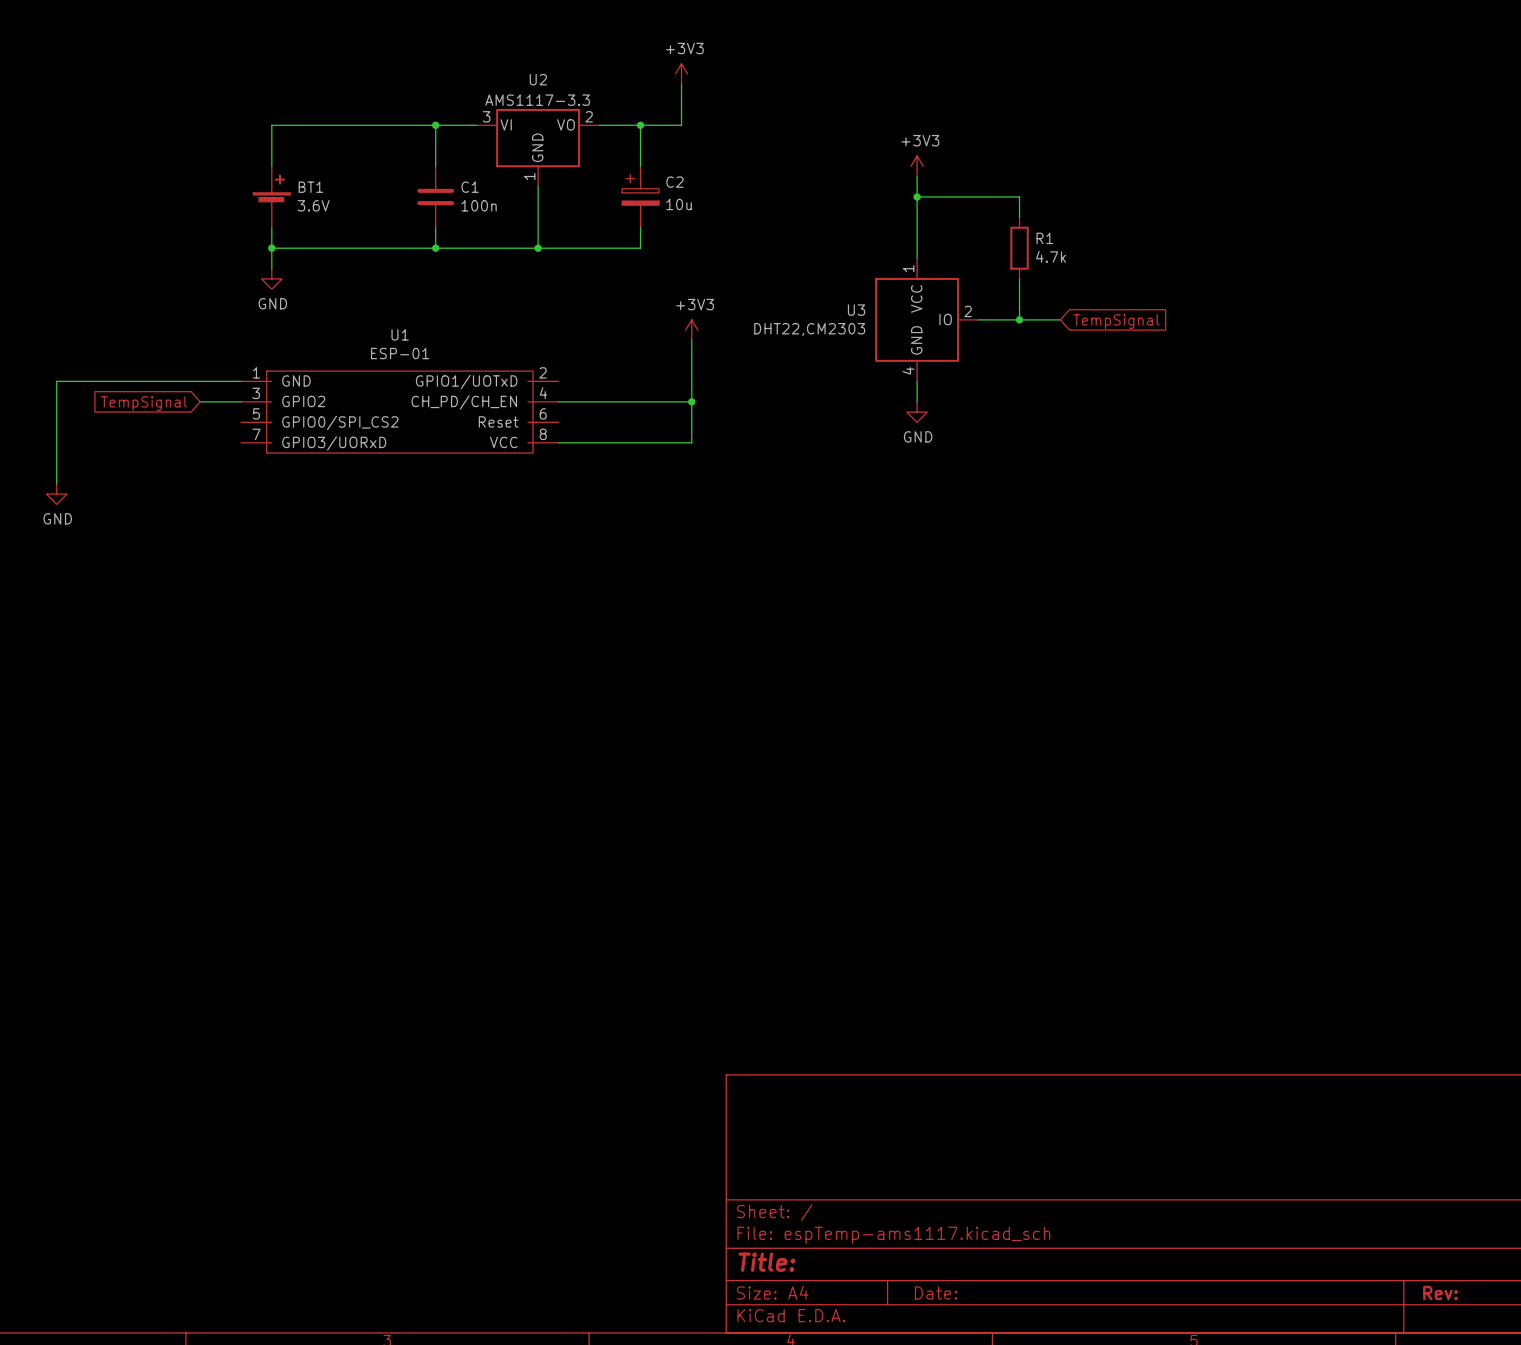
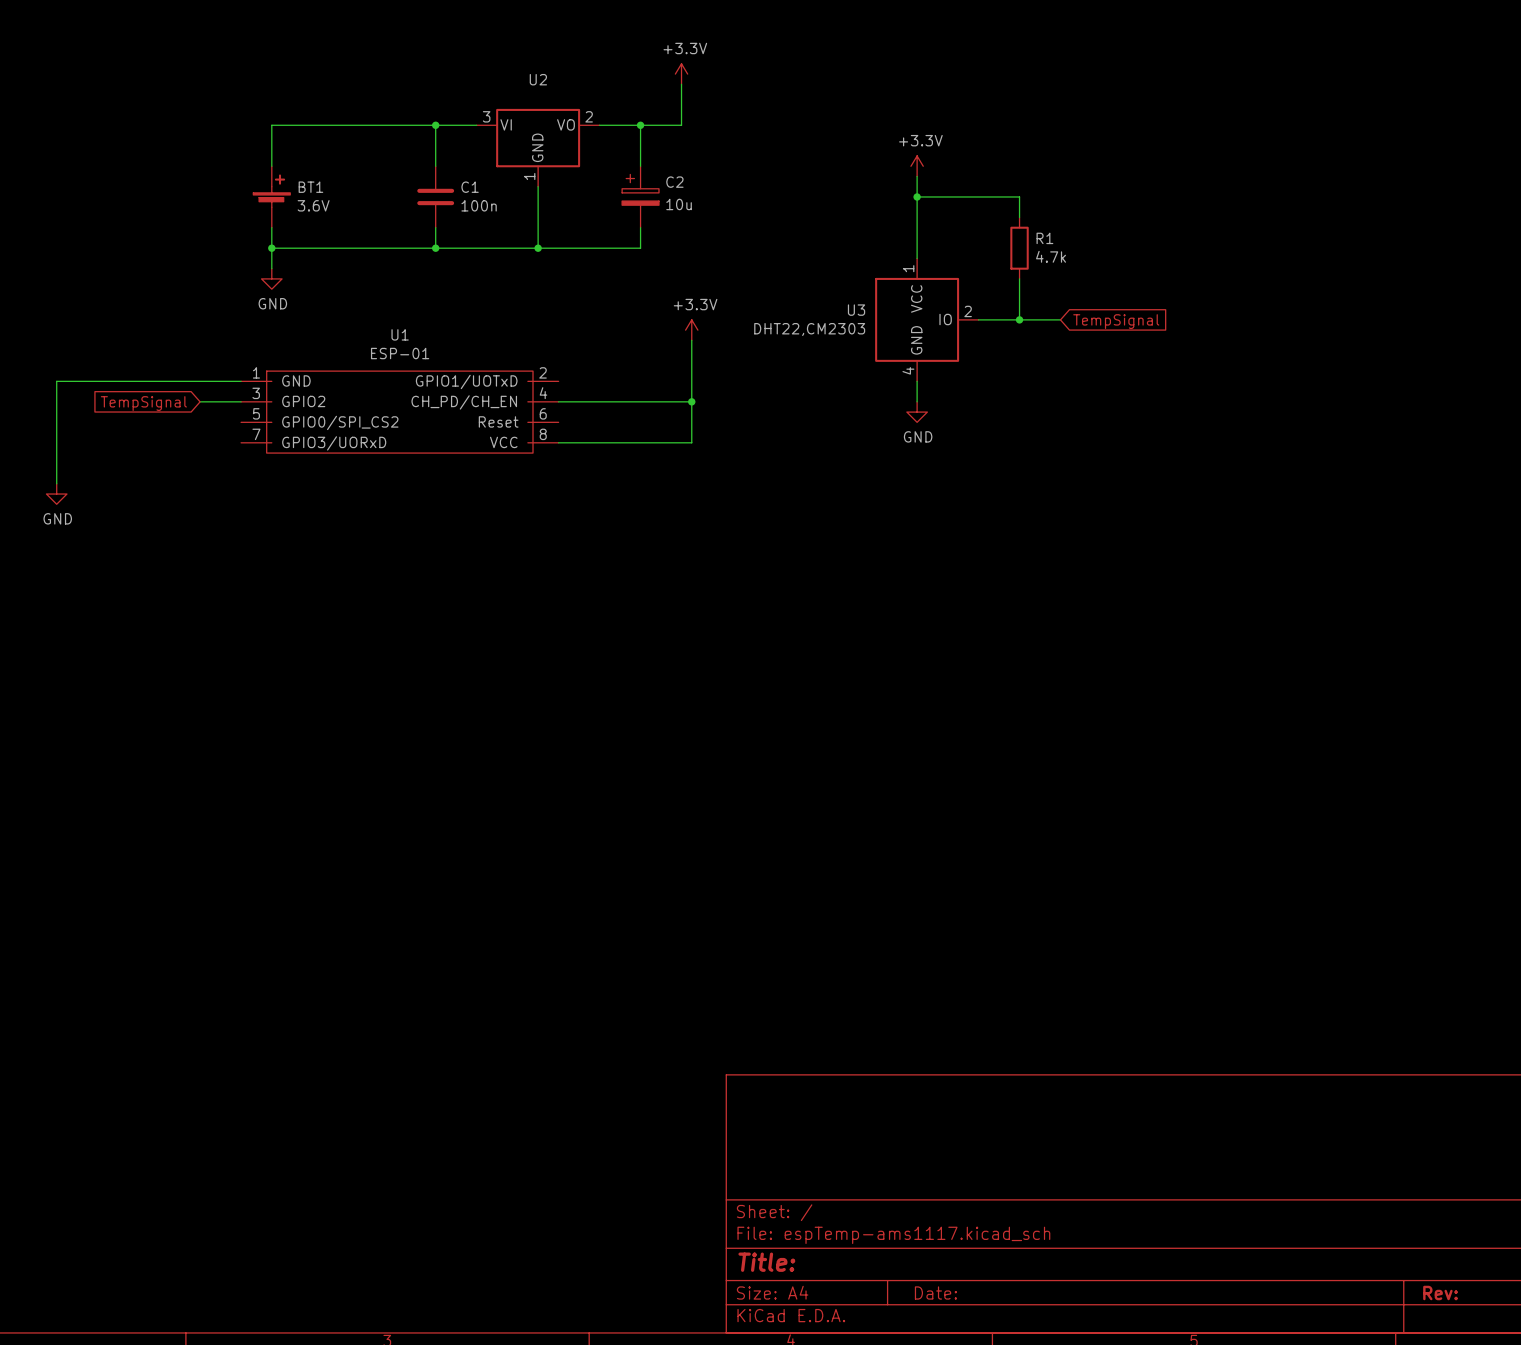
power symbol: +3V3 (681, 74) -> +3.3V (681, 74)
U2 value: AMS1117-3.3 (537, 100) -> none
power symbol: +3V3 (917, 166) -> +3.3V (917, 166)
power symbol: +3V3 (691, 330) -> +3.3V (691, 330)

